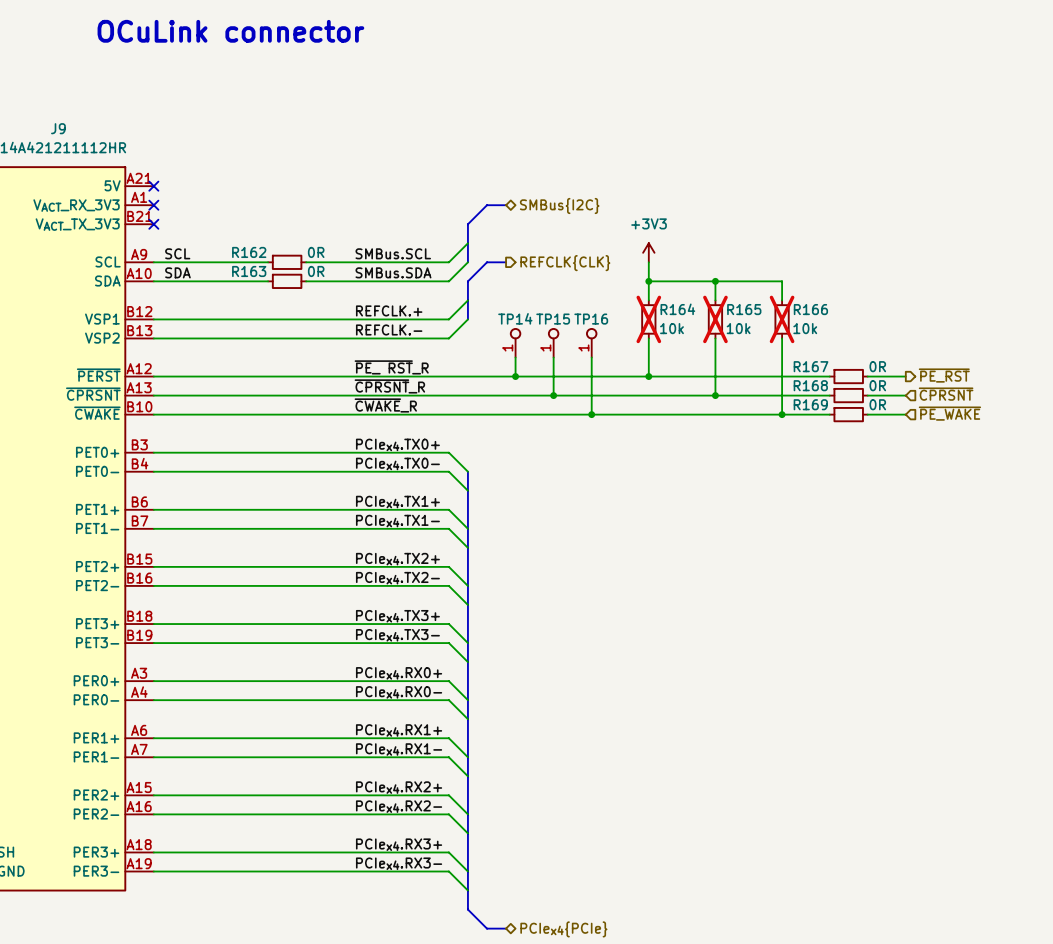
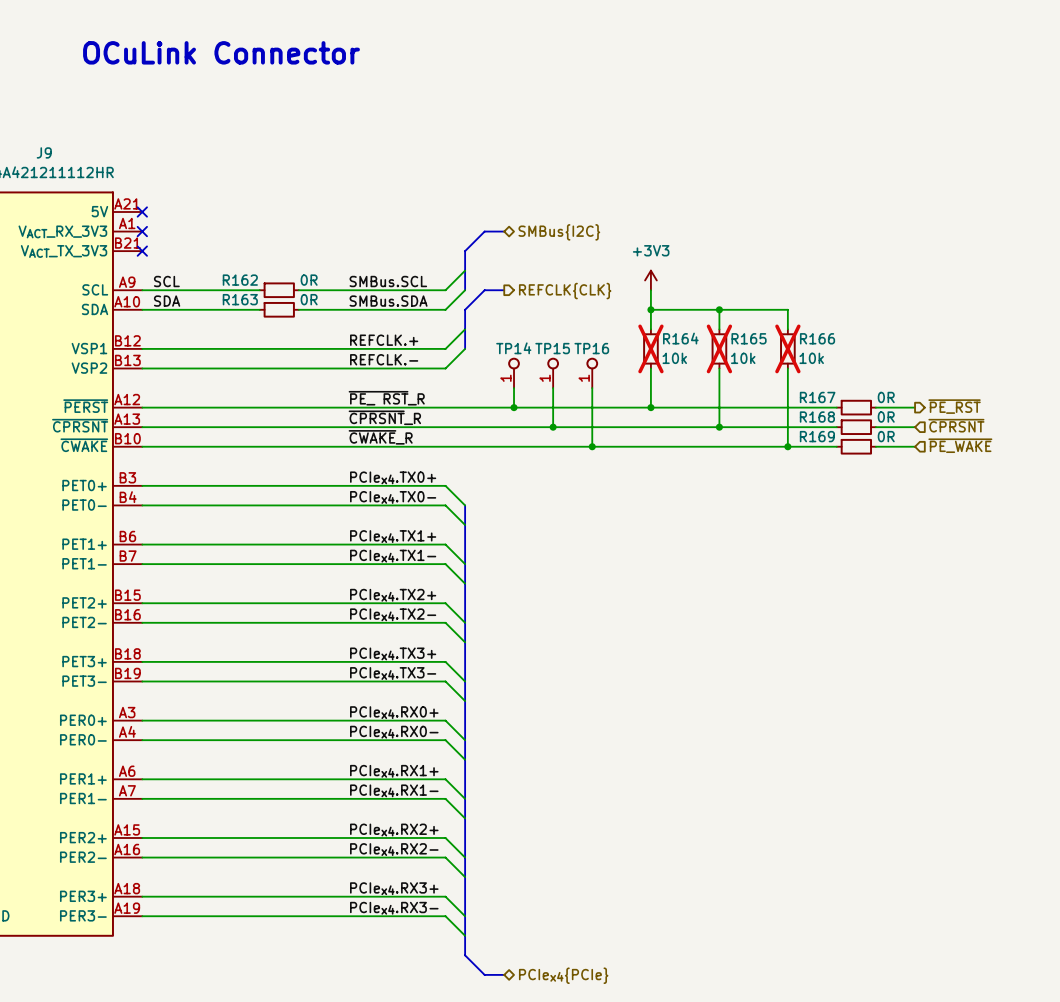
text: OCuLink connector (230, 31) -> OCuLink Connector (221, 52)

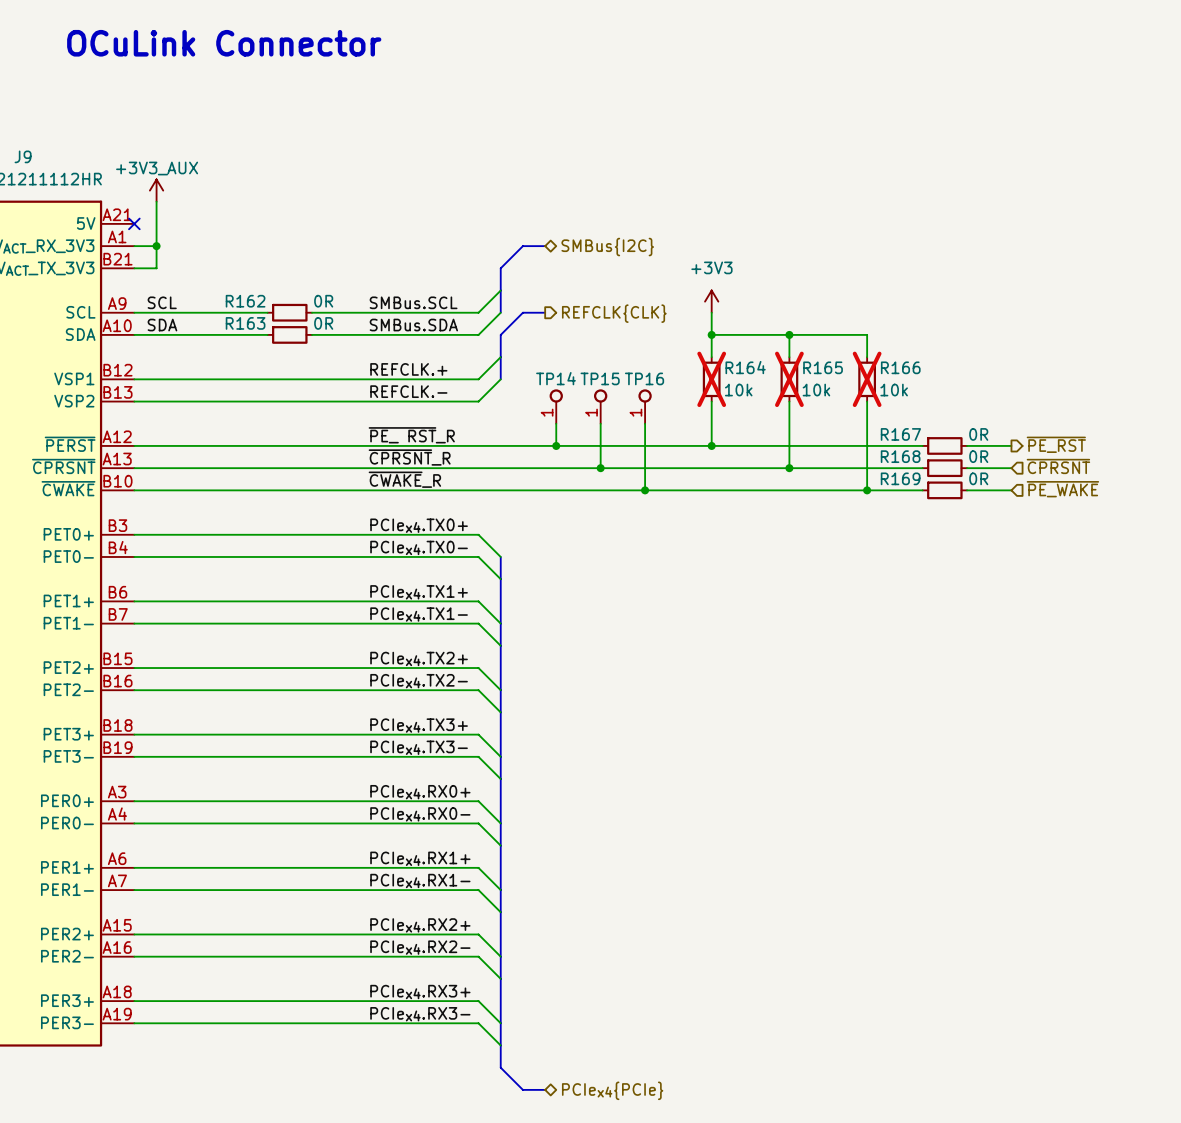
power symbol: none -> +3V3_AUX (156, 190)
wire: none -> (156, 201) (156, 268) (134, 268)
wire: none -> (134, 246) (156, 246)
no-connect mark: (142, 231) -> none
junction: none -> (156, 246)
no-connect mark: (142, 251) -> none

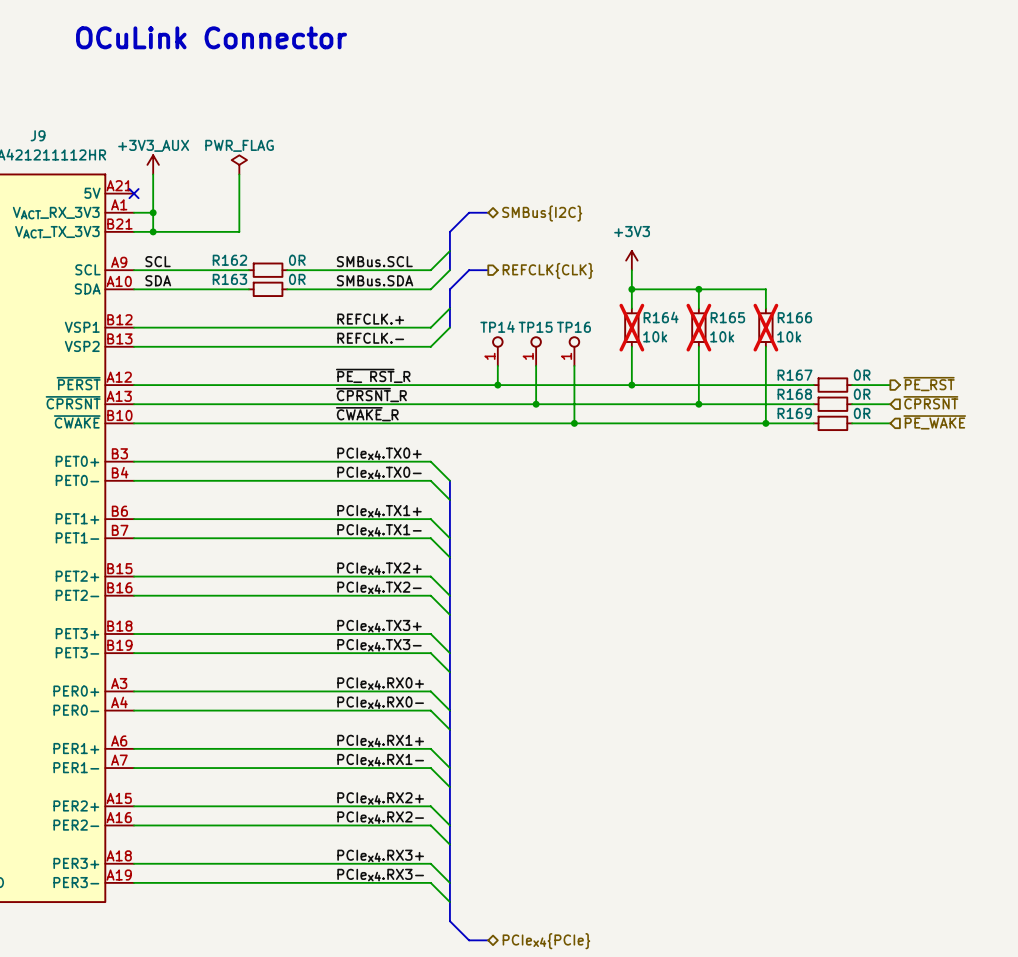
power symbol: none -> PWR_FLAG (239, 164)
wire: none -> (239, 174) (239, 231) (153, 231)
junction: none -> (153, 231)

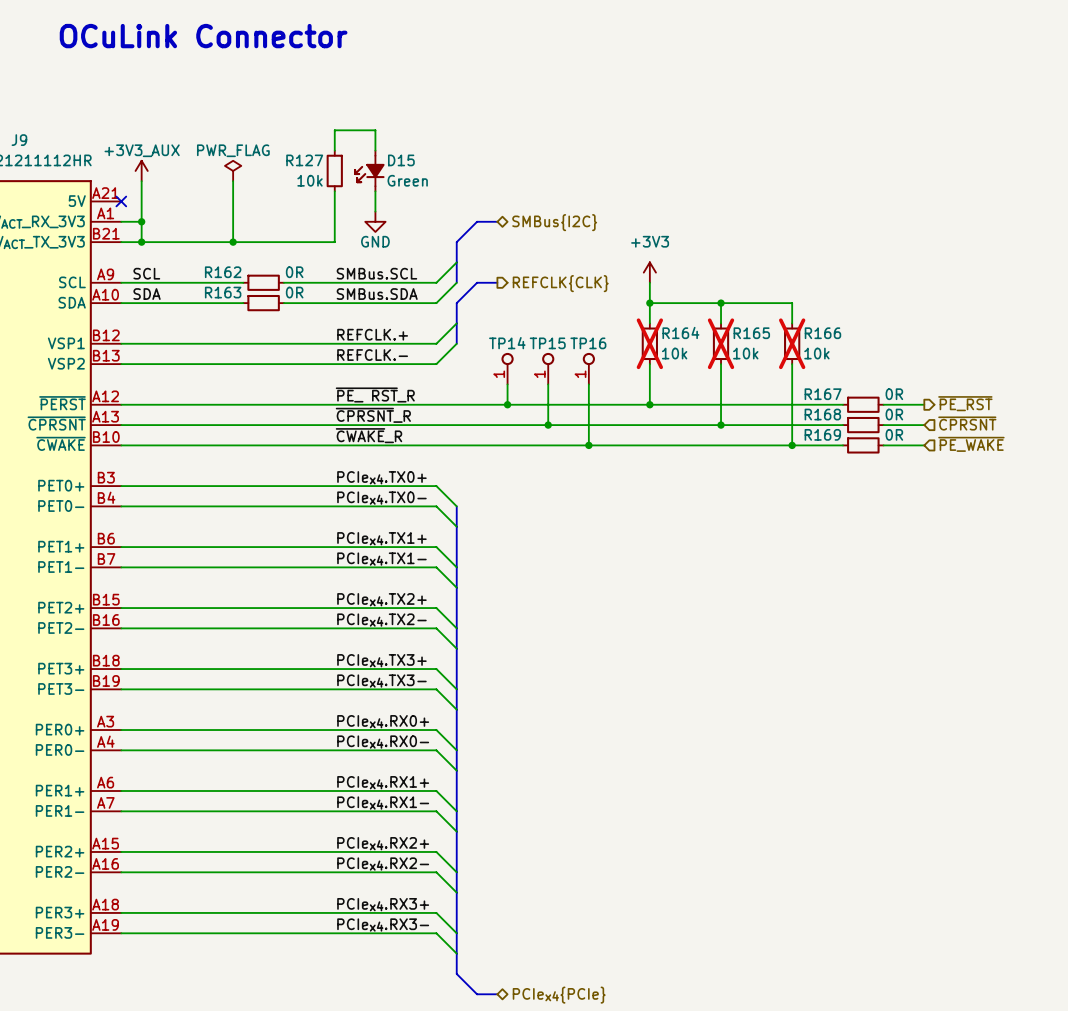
wire: none -> (334, 150) (334, 130) (375, 130) (375, 150)
R127: none -> (334, 170)
D15: none -> (369, 170)
wire: none -> (334, 191) (334, 242) (233, 242)
wire: none -> (375, 191) (375, 211)
power symbol: none -> GND (375, 221)
junction: none -> (233, 242)

